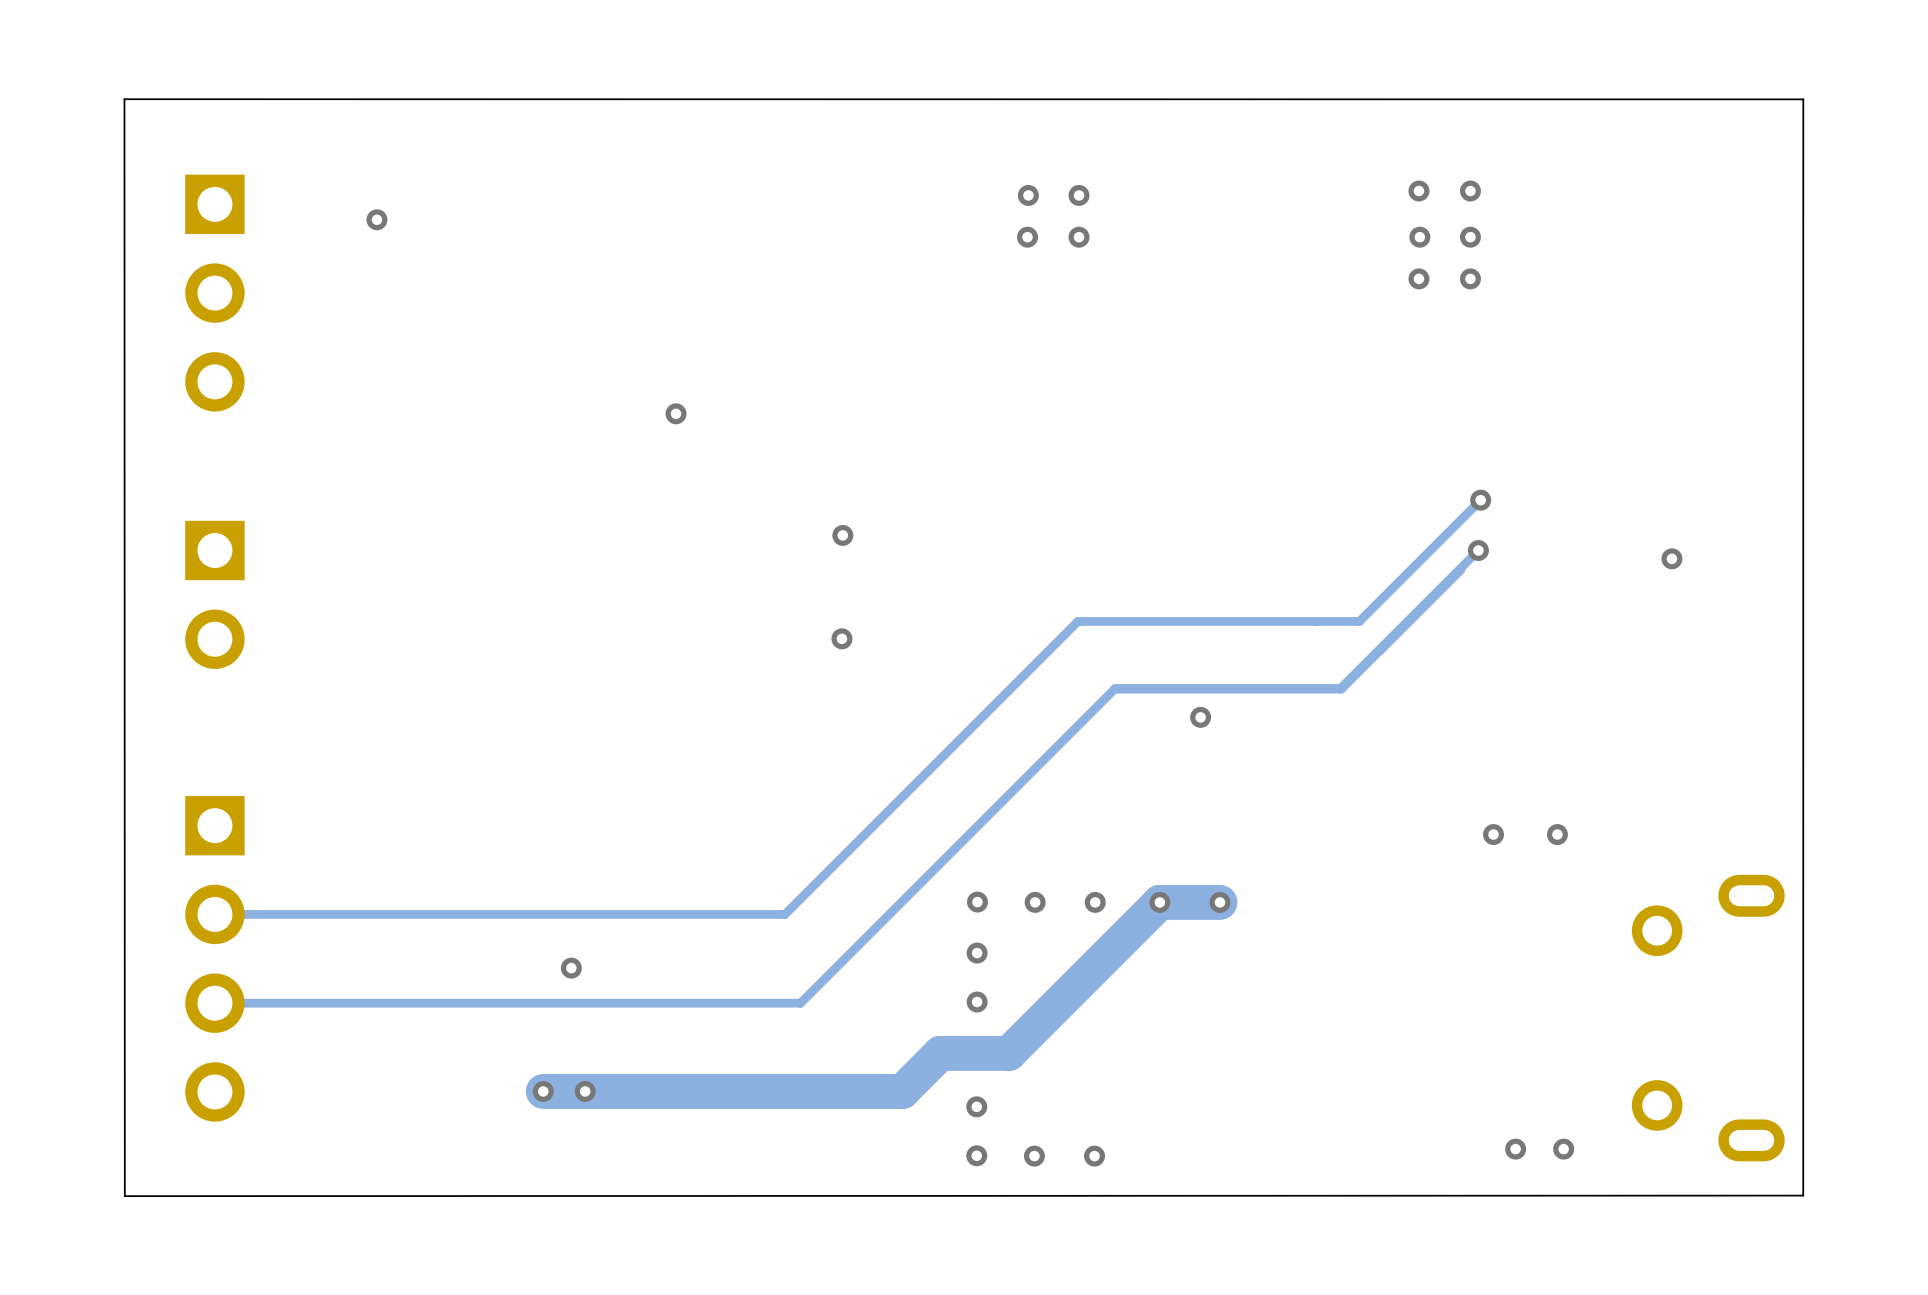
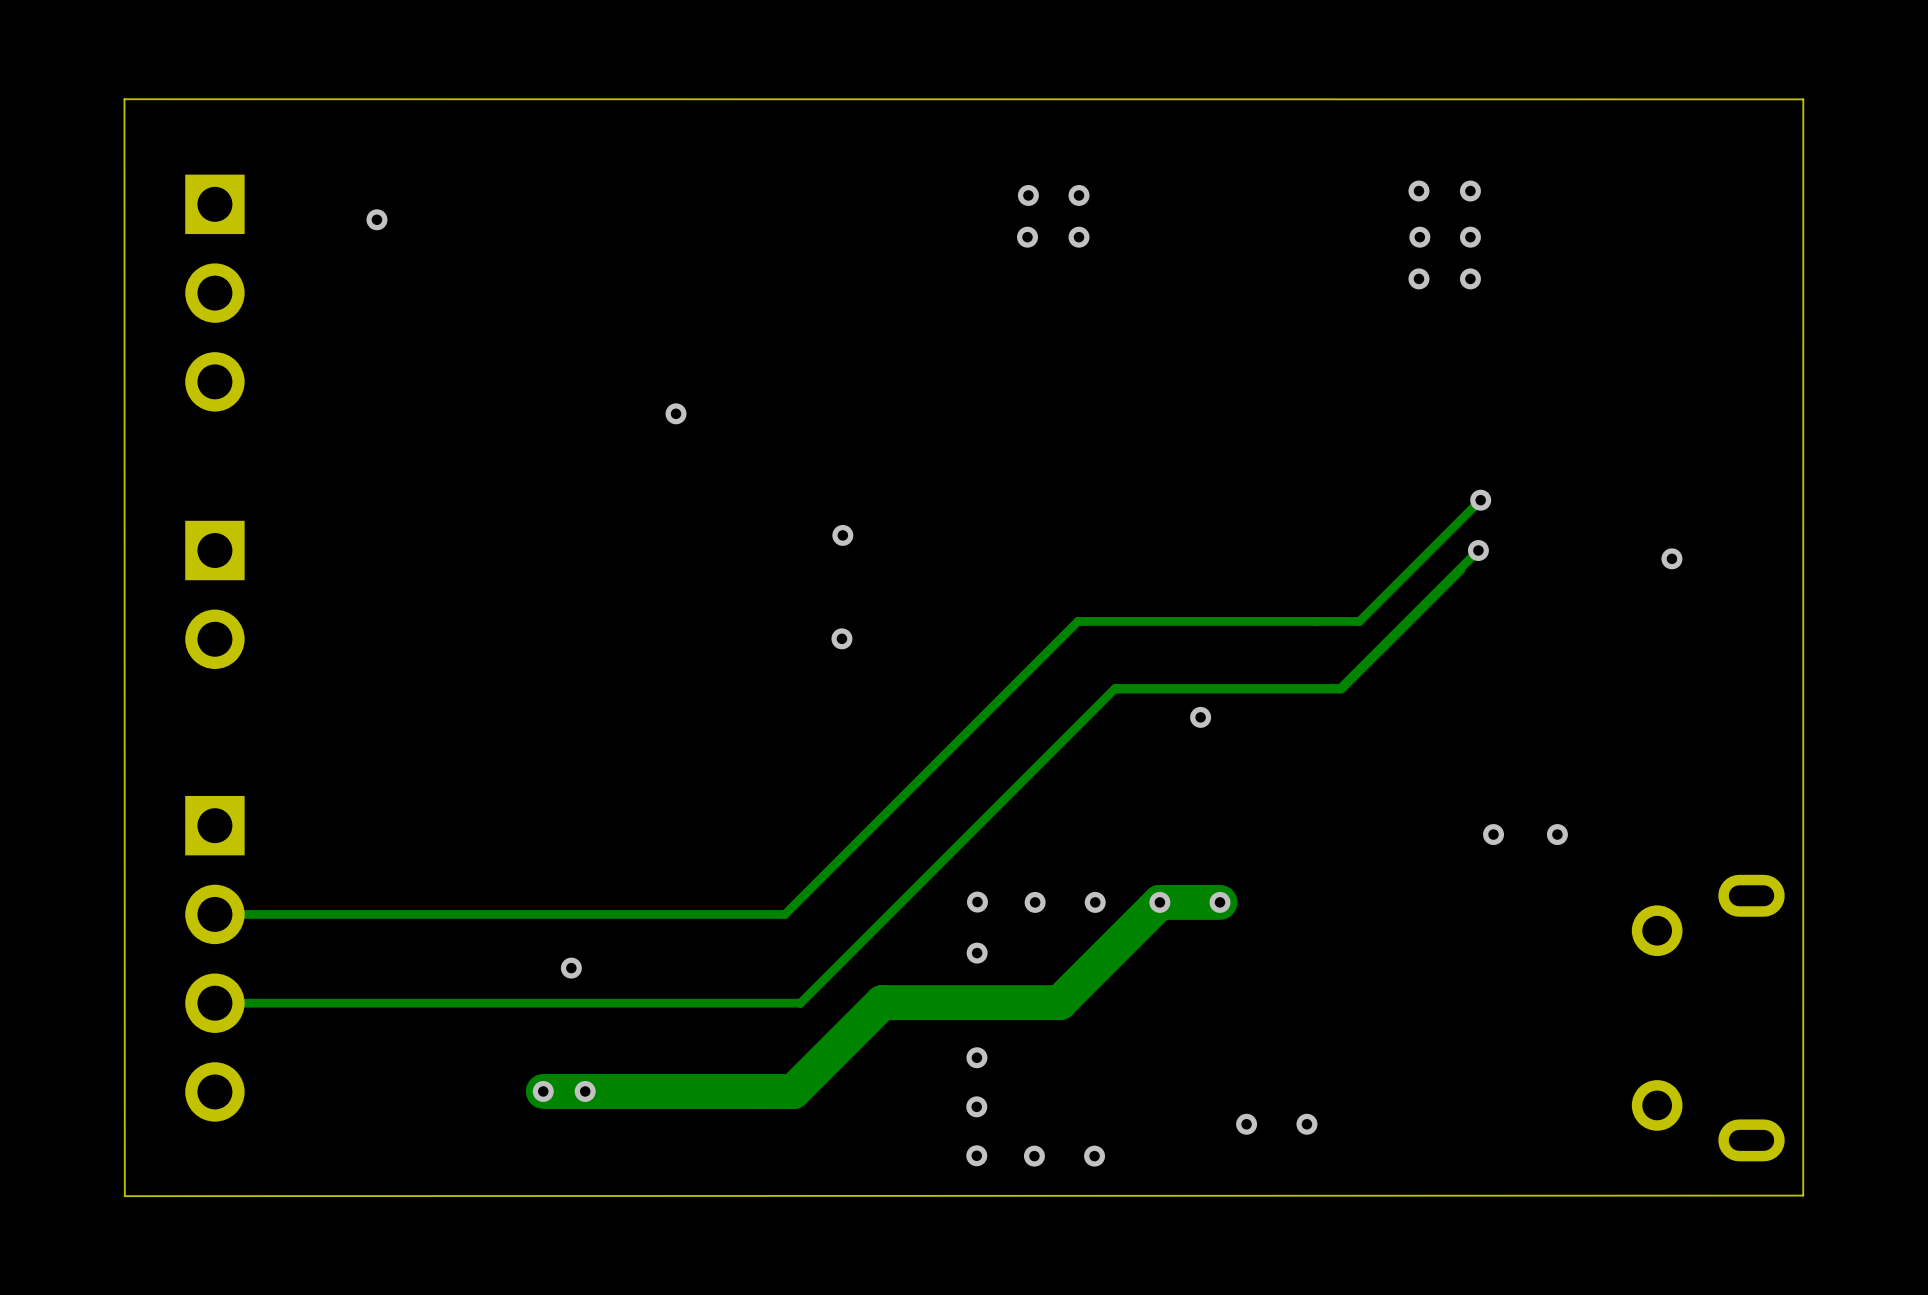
via position: (977, 1002) -> (976, 1057)
track: (1059, 1002) (1008, 1053) (940, 1053) (902, 1091) (793, 1091) -> (1059, 1002) (882, 1002) (793, 1091)
via: none -> (1246, 1124)
via: none -> (1306, 1124)
via: (1515, 1149) -> none
via: (1563, 1149) -> none

